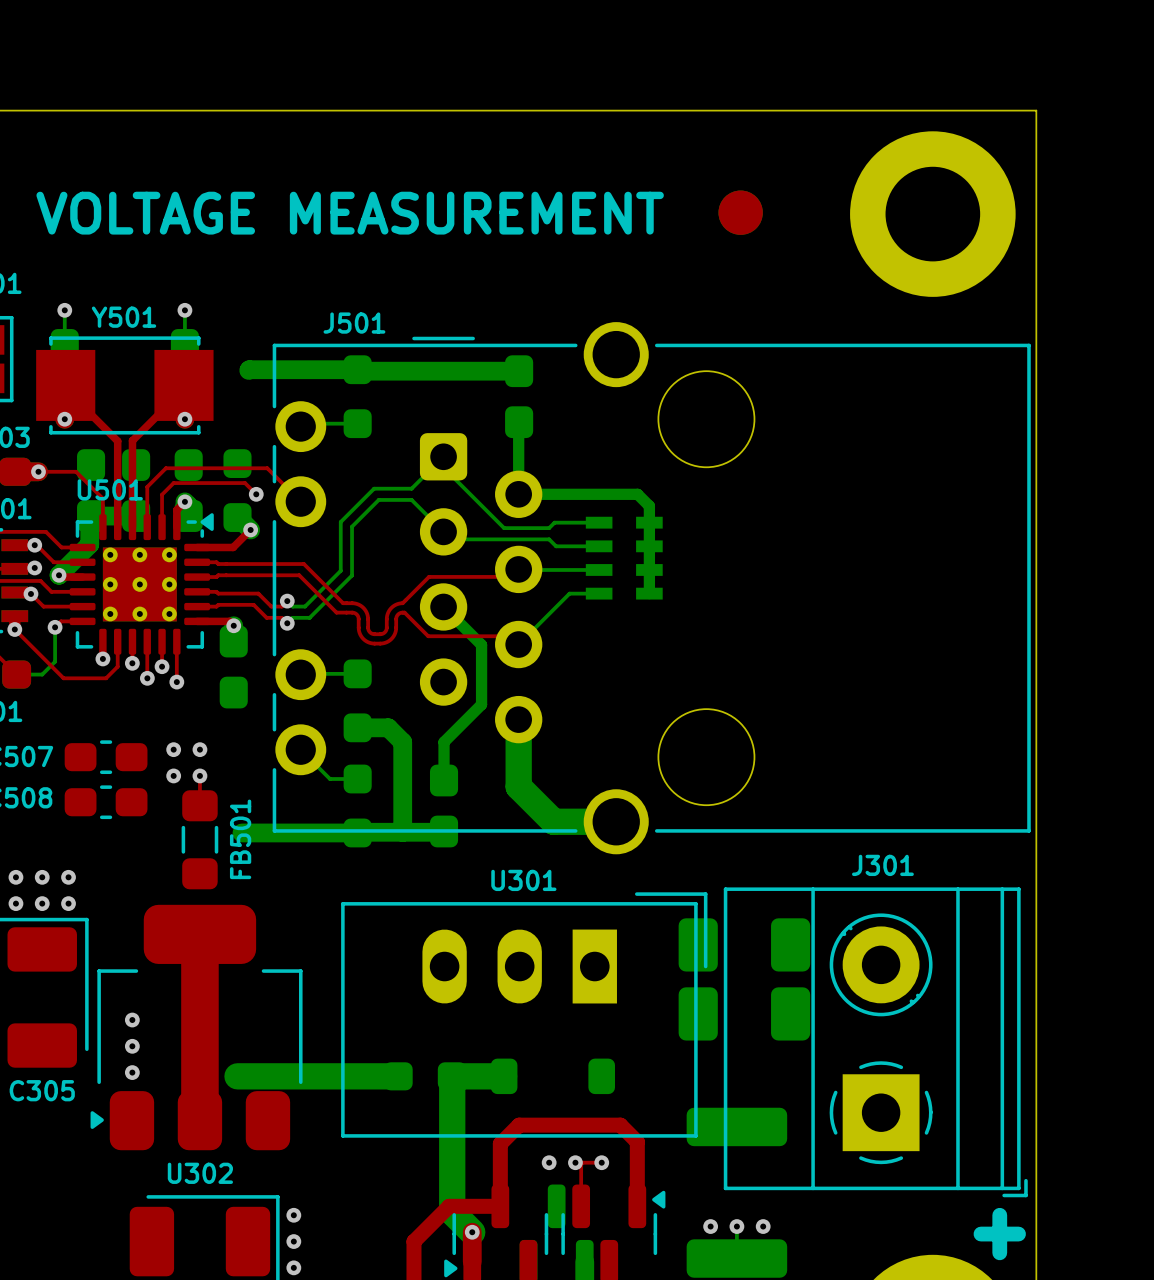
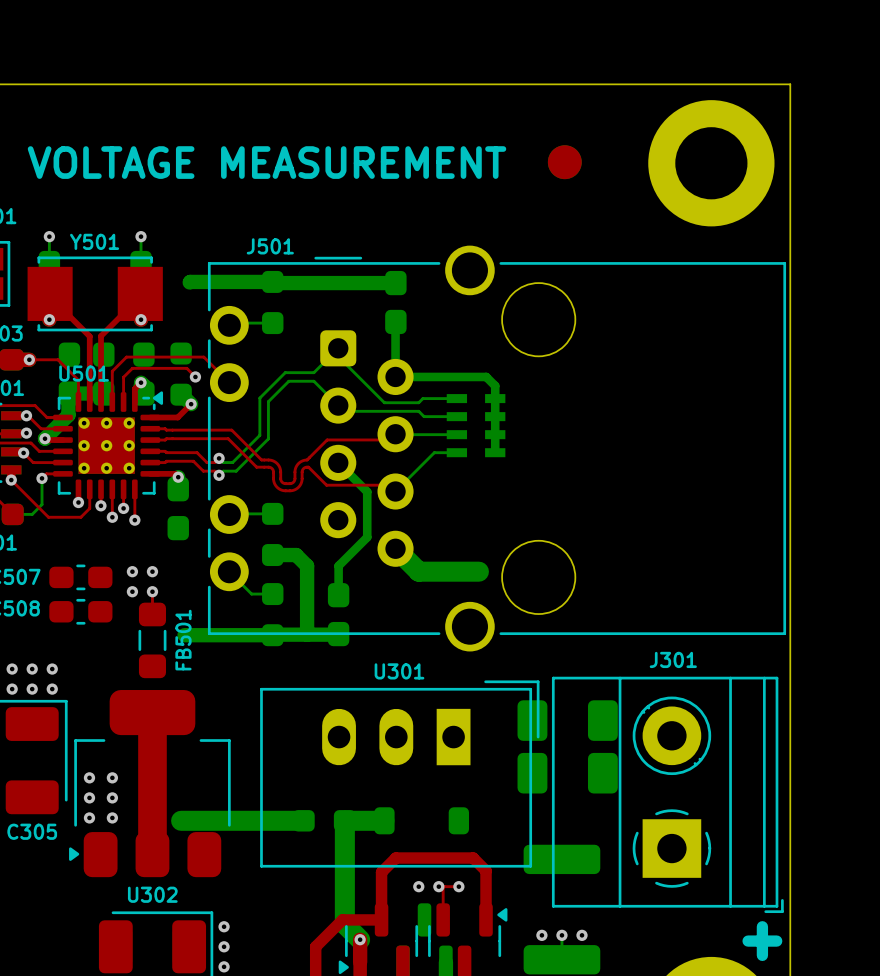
bottom track: (518, 719) (518, 786) (553, 821) (616, 821) -> (395, 548) (418, 571) (478, 571)
via: none -> (89, 777)
via: (132, 1020) -> none
via: none -> (112, 777)
via: none -> (89, 797)
via: (132, 1046) -> none
via: none -> (112, 797)
via: none -> (89, 817)
via: (132, 1072) -> none
via: none -> (112, 817)

